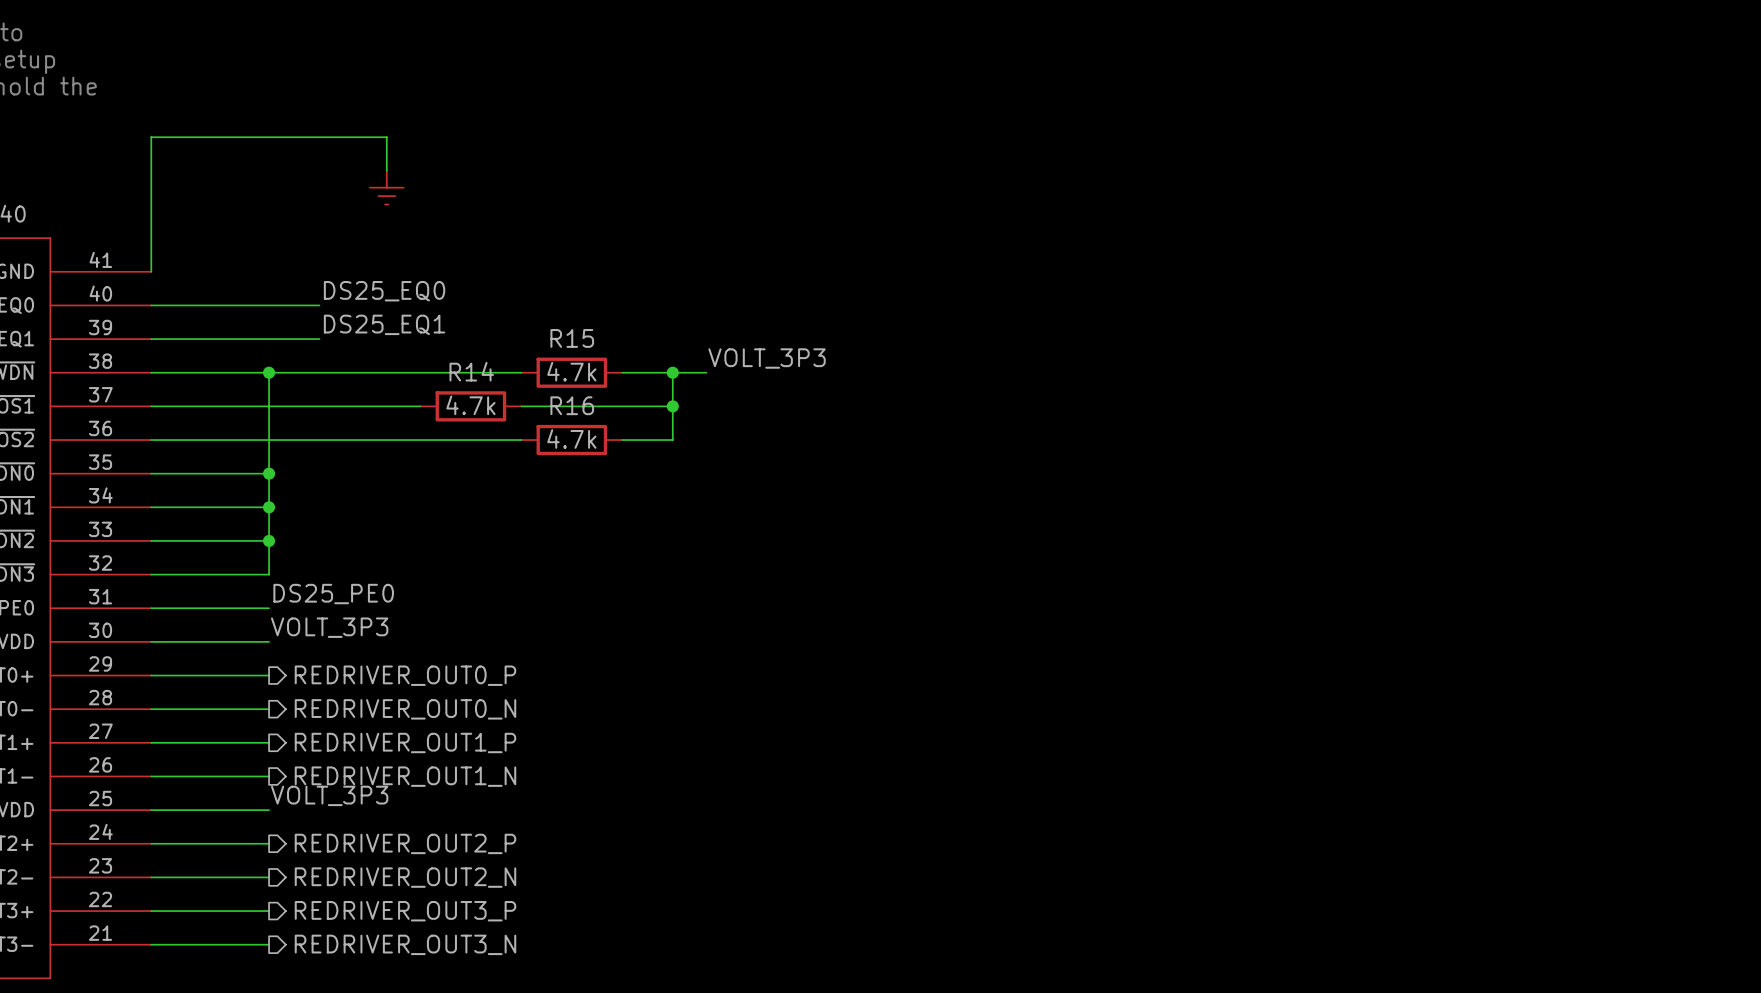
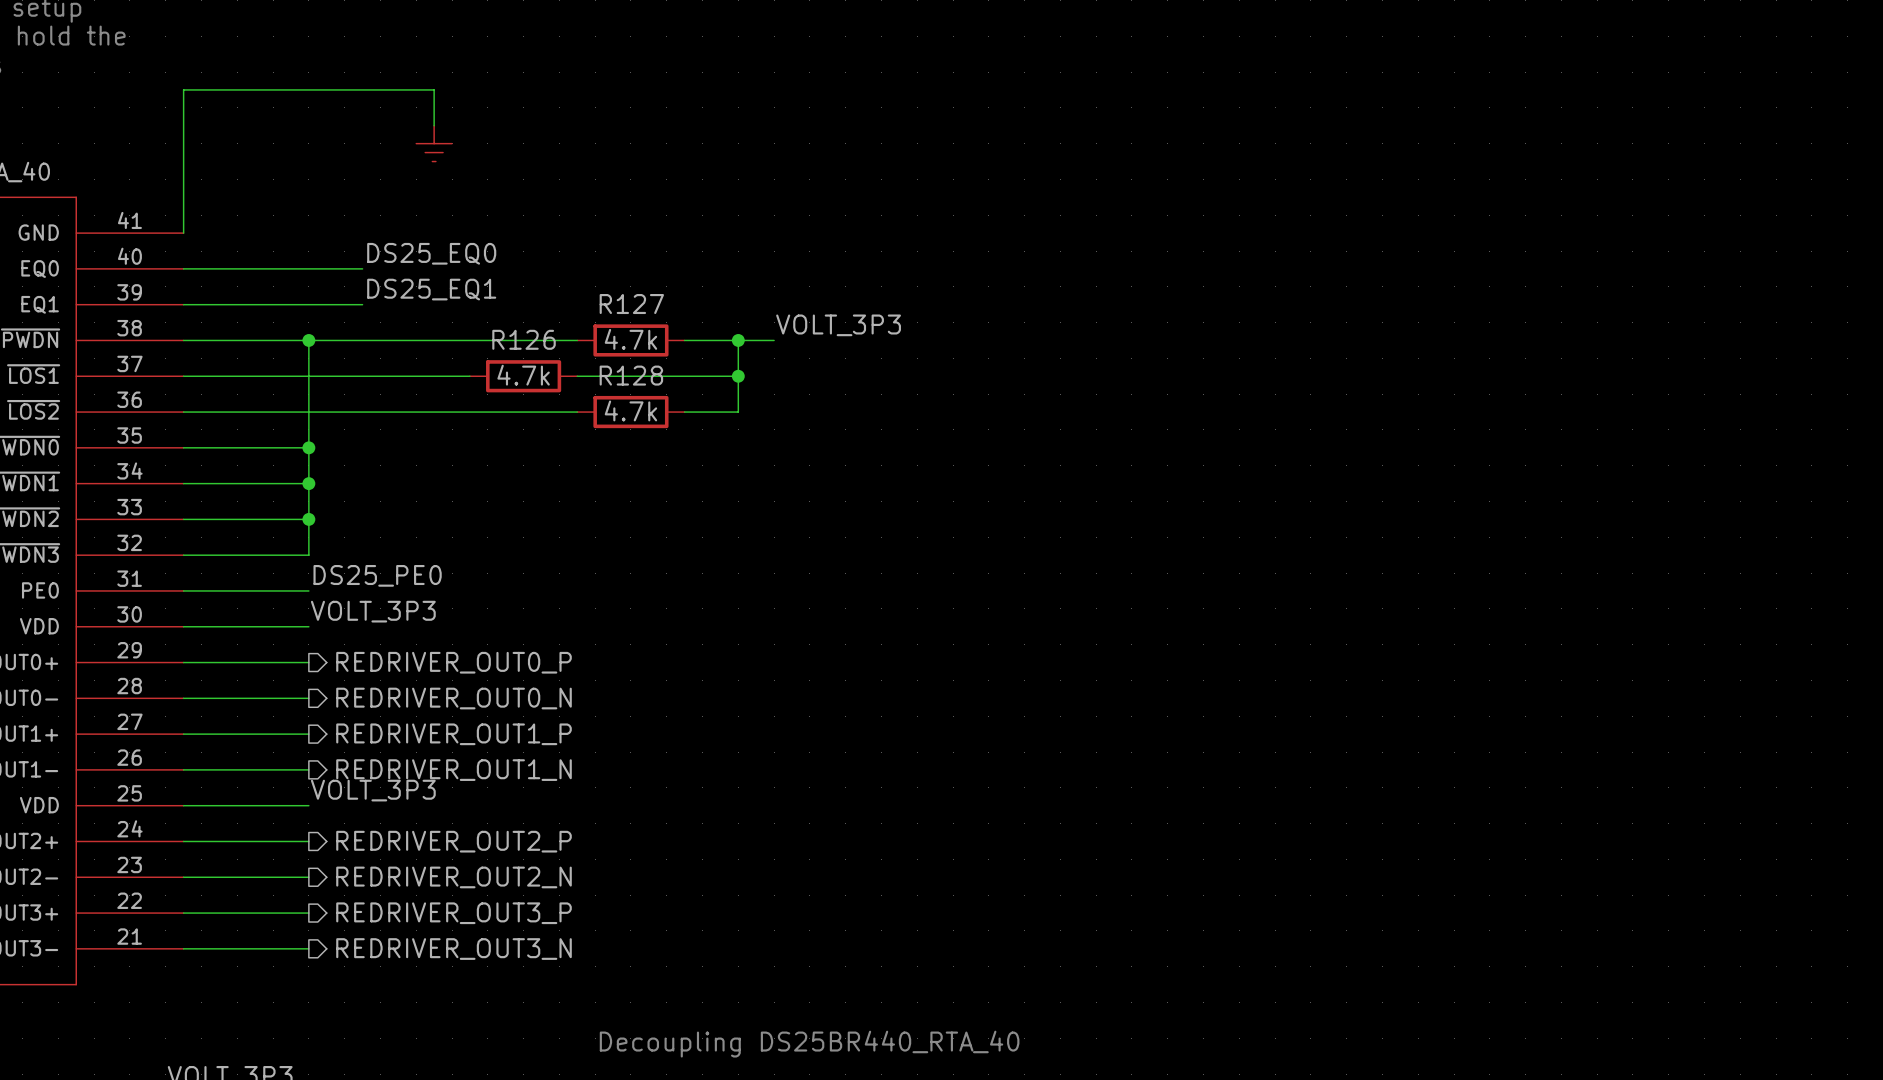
R15 name: R15 (572, 338) -> R127 (631, 304)
R14 name: R14 (471, 371) -> R126 (524, 339)
R16 name: R16 (572, 405) -> R128 (631, 375)

